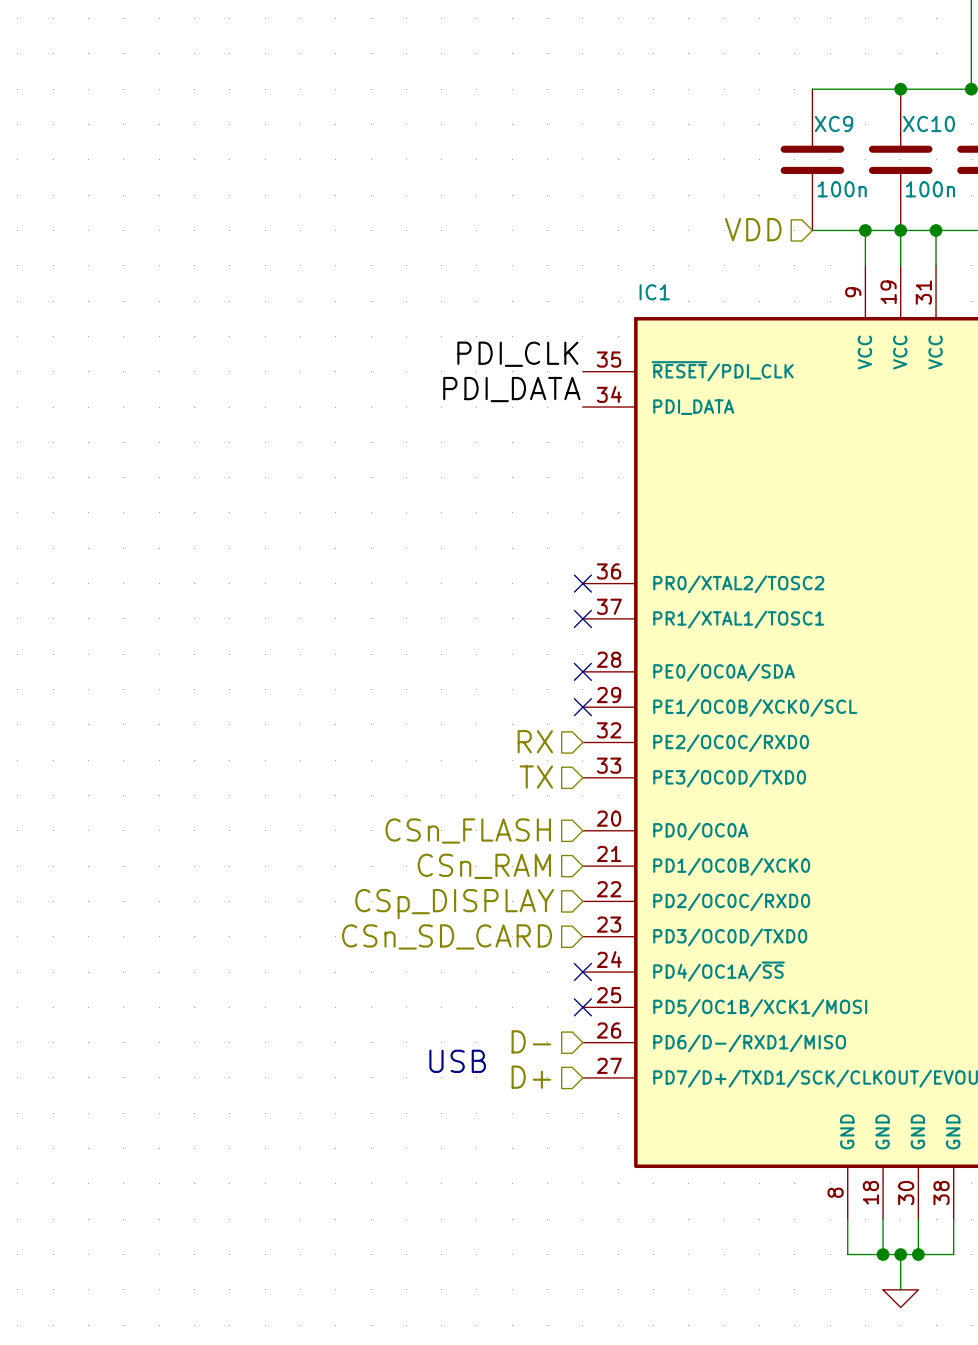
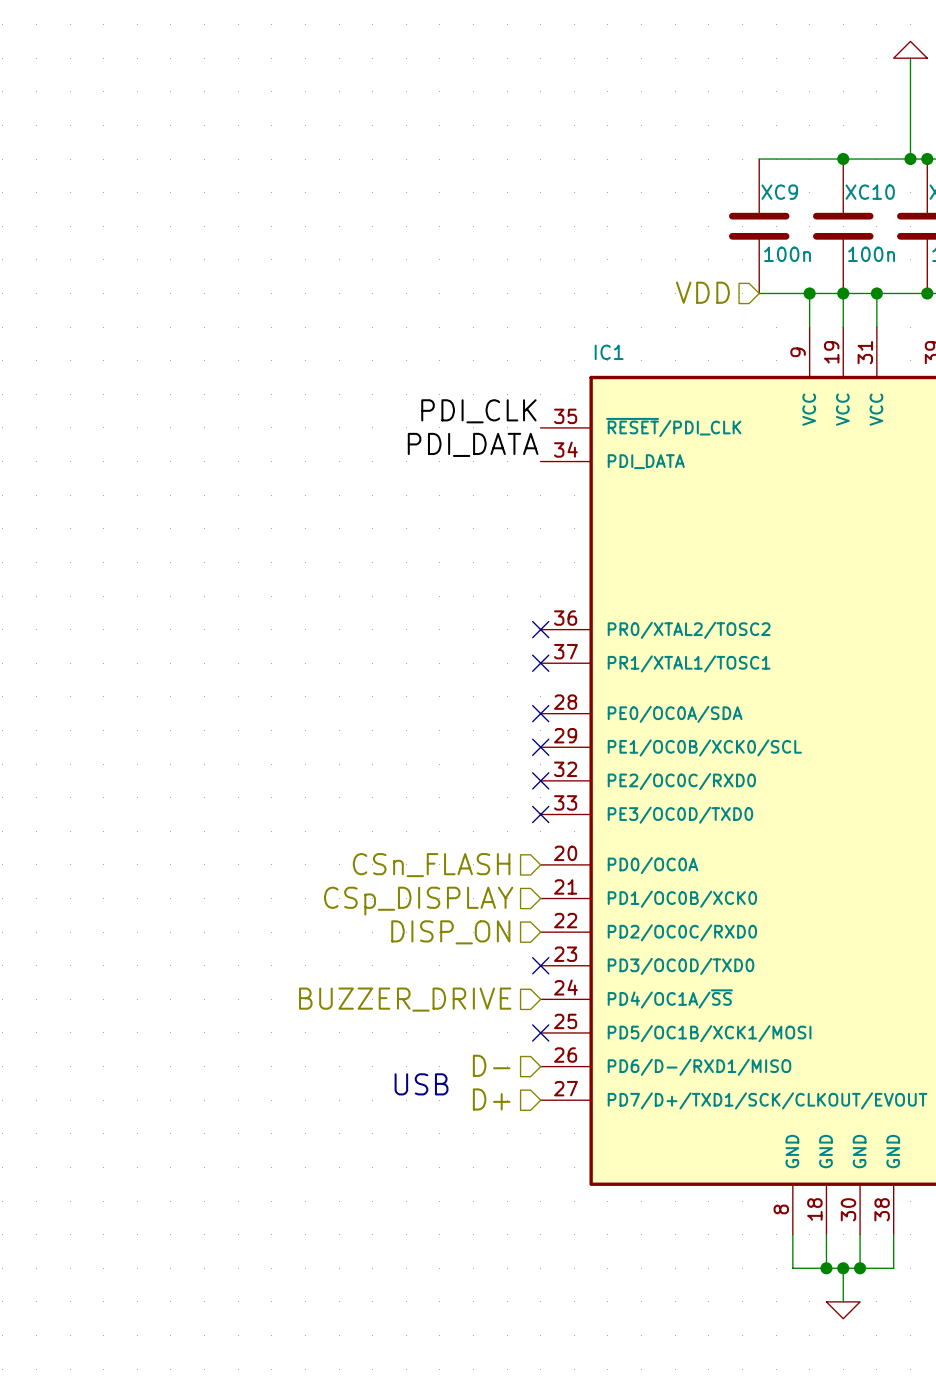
hierarchical label: RX (535, 741) -> none
no-connect mark: none -> (540, 780)
hierarchical label: TX (536, 777) -> none
no-connect mark: none -> (540, 814)
hierarchical label: CSn_RAM (484, 866) -> CSp_DISPLAY (418, 901)
hierarchical label: CSp_DISPLAY (454, 904) -> DISP_ON (450, 932)
hierarchical label: CSn_SD_CARD (447, 936) -> none
hierarchical label: none -> BUZZER_DRIVE (405, 999)
no-connect mark position: (582, 972) -> (540, 965)

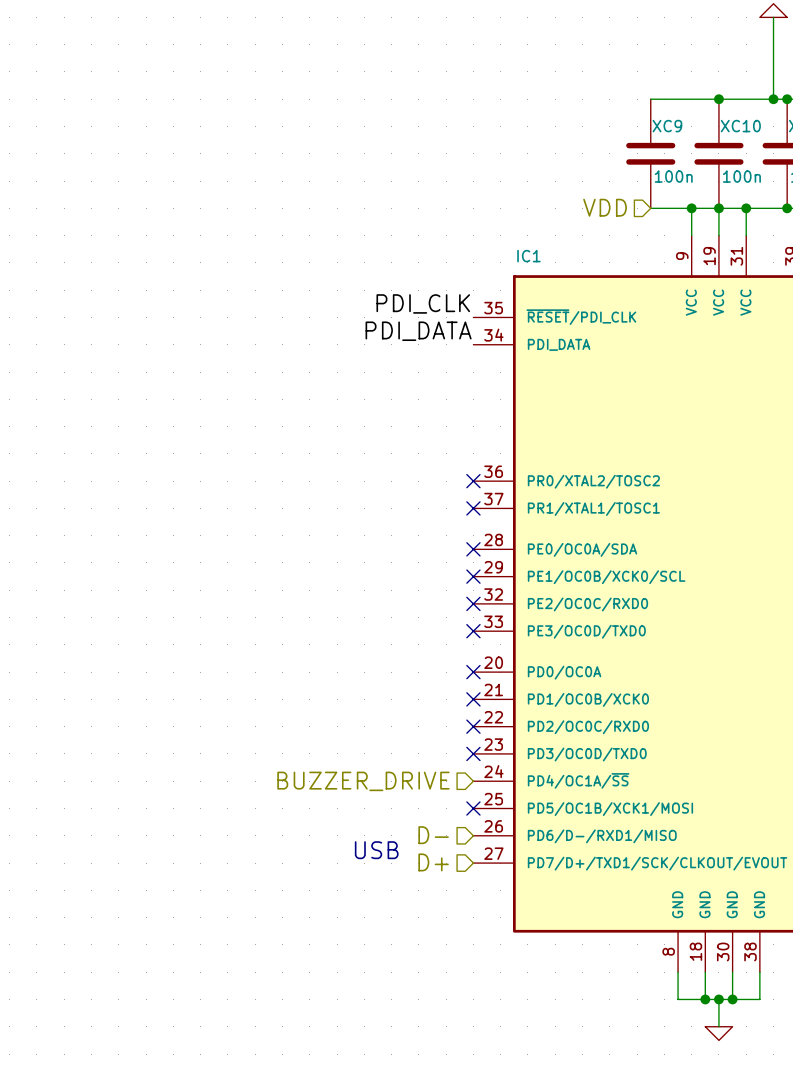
no-connect mark: none -> (473, 672)
hierarchical label: CSn_FLASH (431, 865) -> none
no-connect mark: none -> (473, 699)
hierarchical label: CSp_DISPLAY (418, 901) -> none
hierarchical label: DISP_ON (450, 932) -> none
no-connect mark: none -> (473, 726)

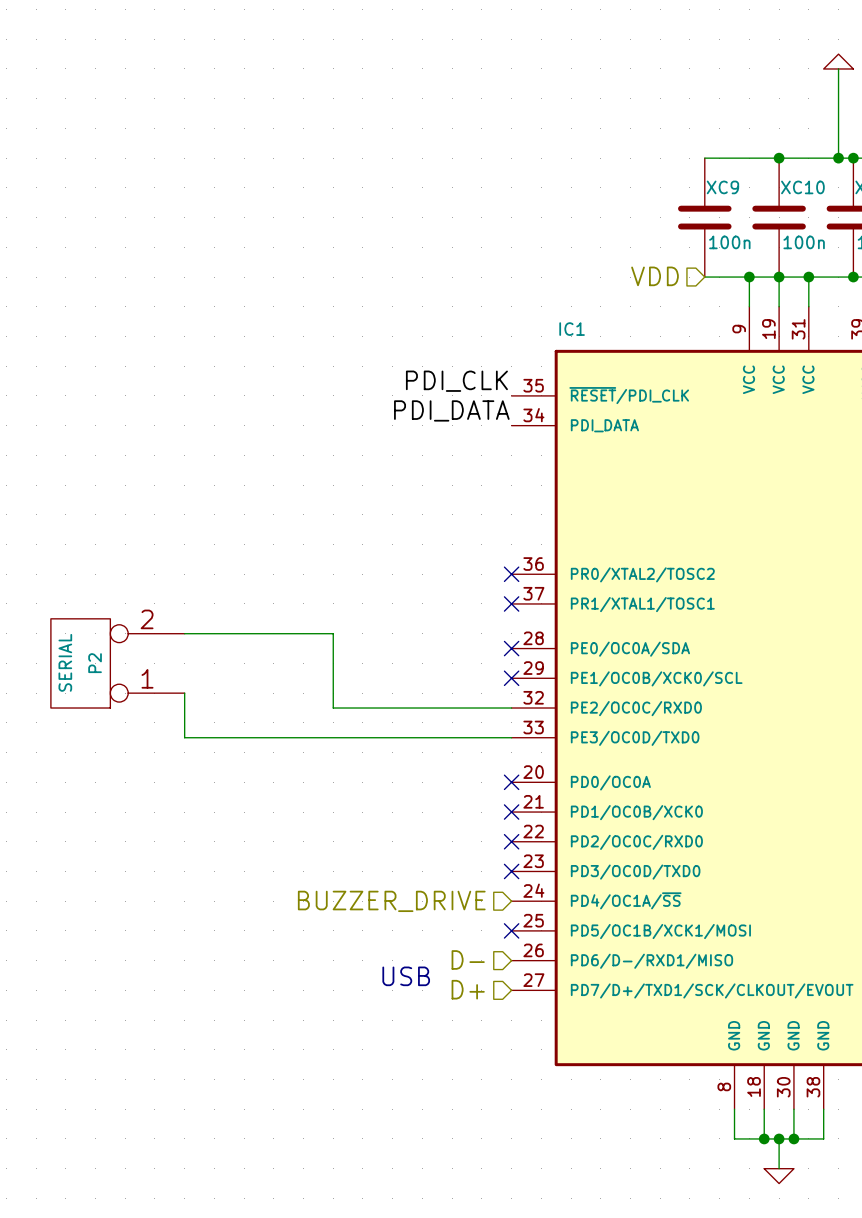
wire: none -> (184, 633) (333, 633) (333, 708) (511, 708)
P2: none -> SERIAL (117, 663)
wire: none -> (184, 693) (184, 737) (511, 737)
no-connect mark: (473, 603) -> none
no-connect mark: (473, 631) -> none

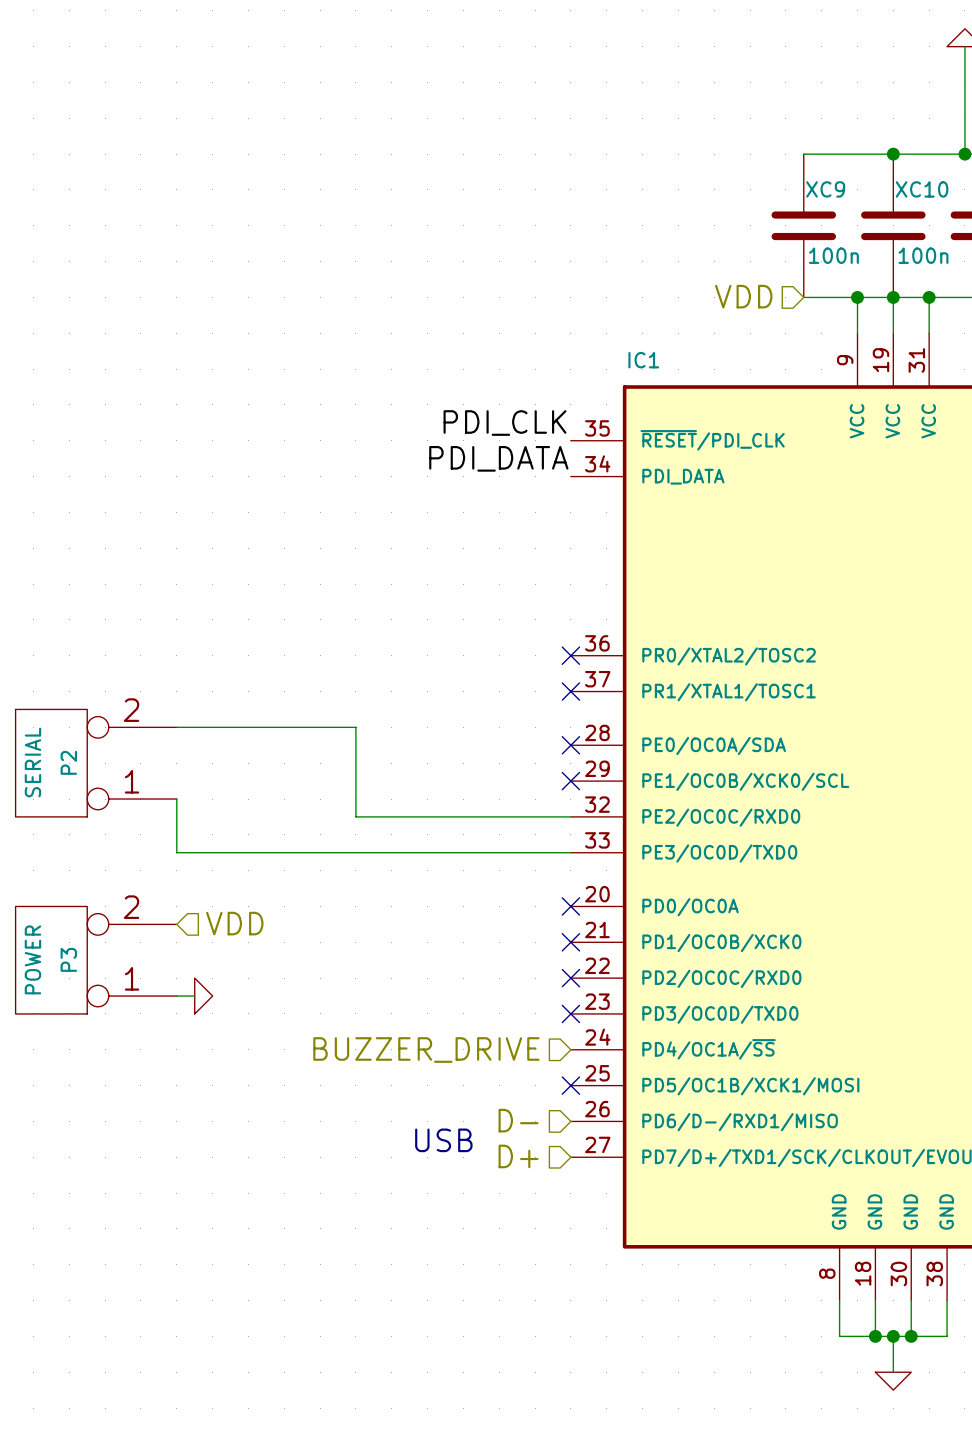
hierarchical label: none -> VDD (234, 923)
P3: none -> POWER (96, 960)
wire: none -> (176, 996) (194, 996)
power symbol: none -> (203, 996)

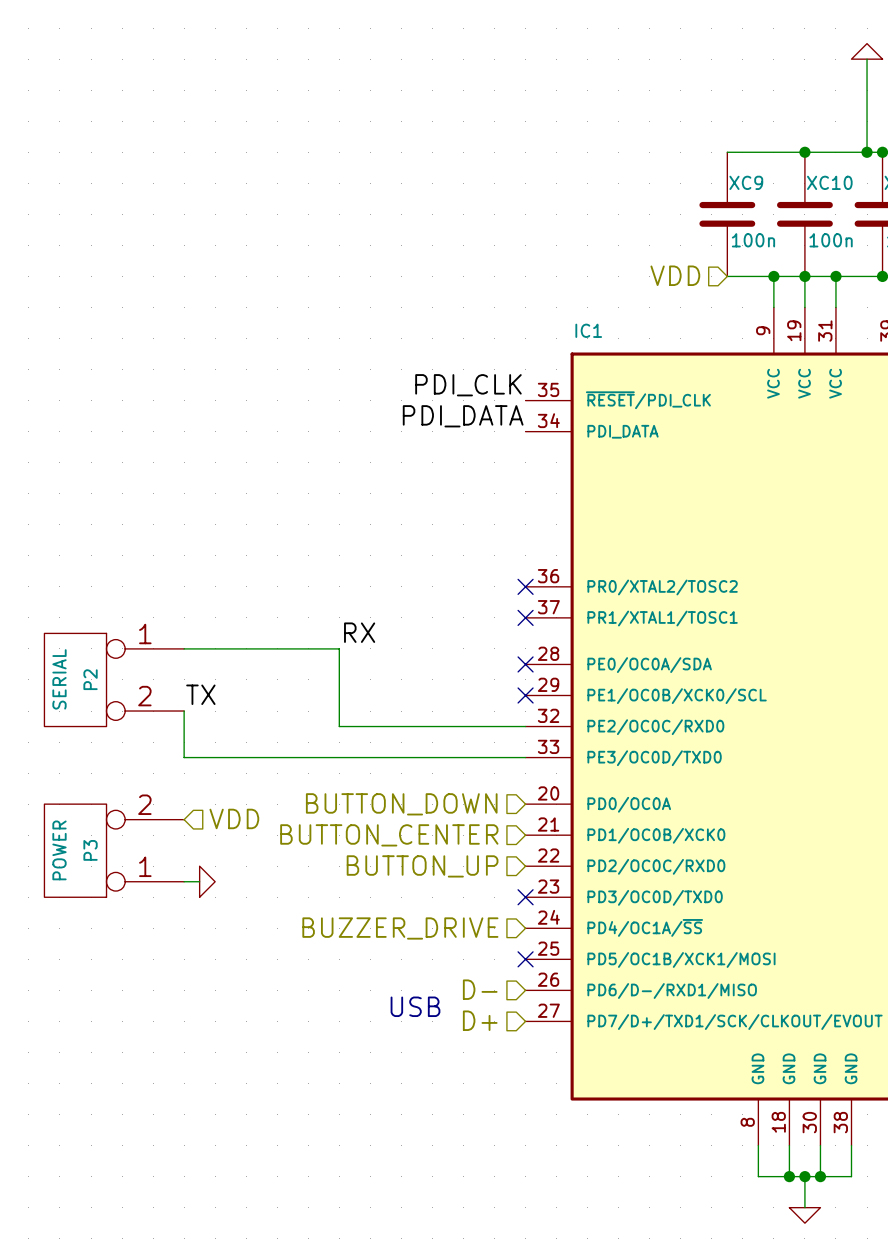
label: none -> RX (359, 632)
P2 flip: as is (51, 763) -> up-down (75, 679)
label: none -> TX (200, 694)
hierarchical label: none -> BUTTON_DOWN (401, 804)
no-connect mark: (570, 906) -> none
hierarchical label: none -> BUTTON_CENTER (389, 835)
no-connect mark: (570, 942) -> none
hierarchical label: none -> BUTTON_UP (422, 866)
no-connect mark: (570, 978) -> none

